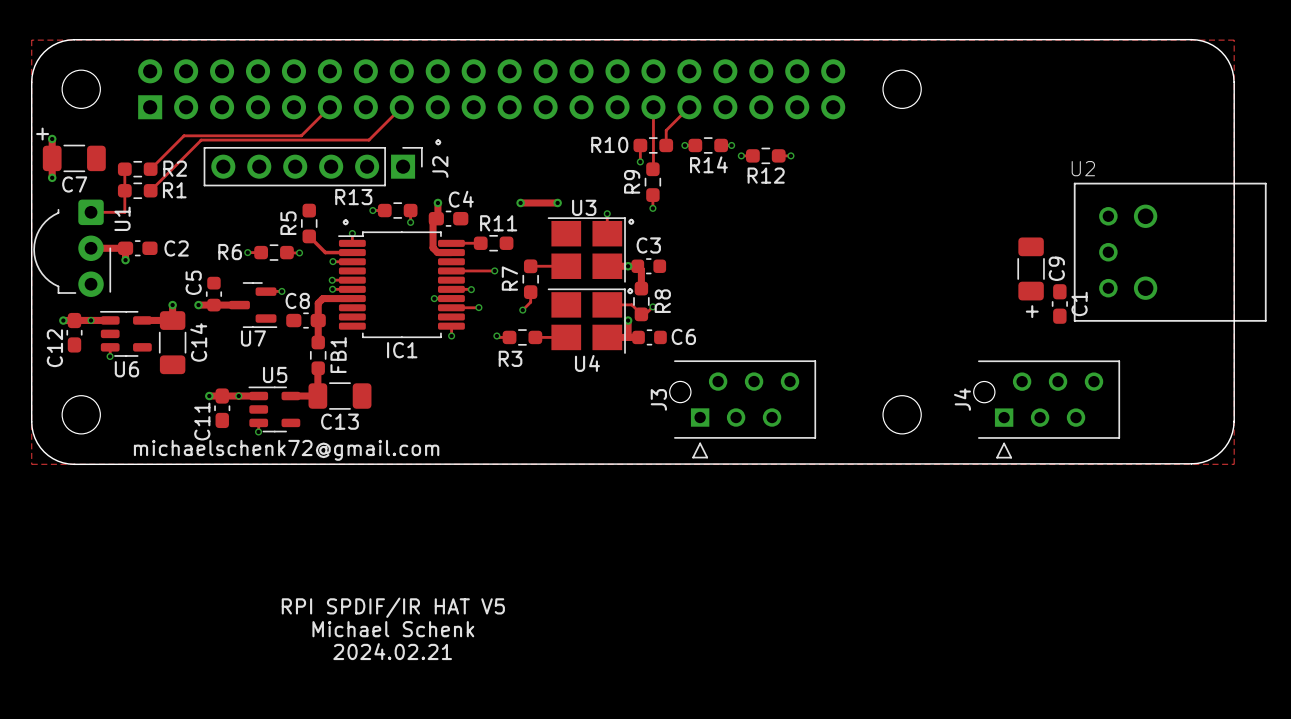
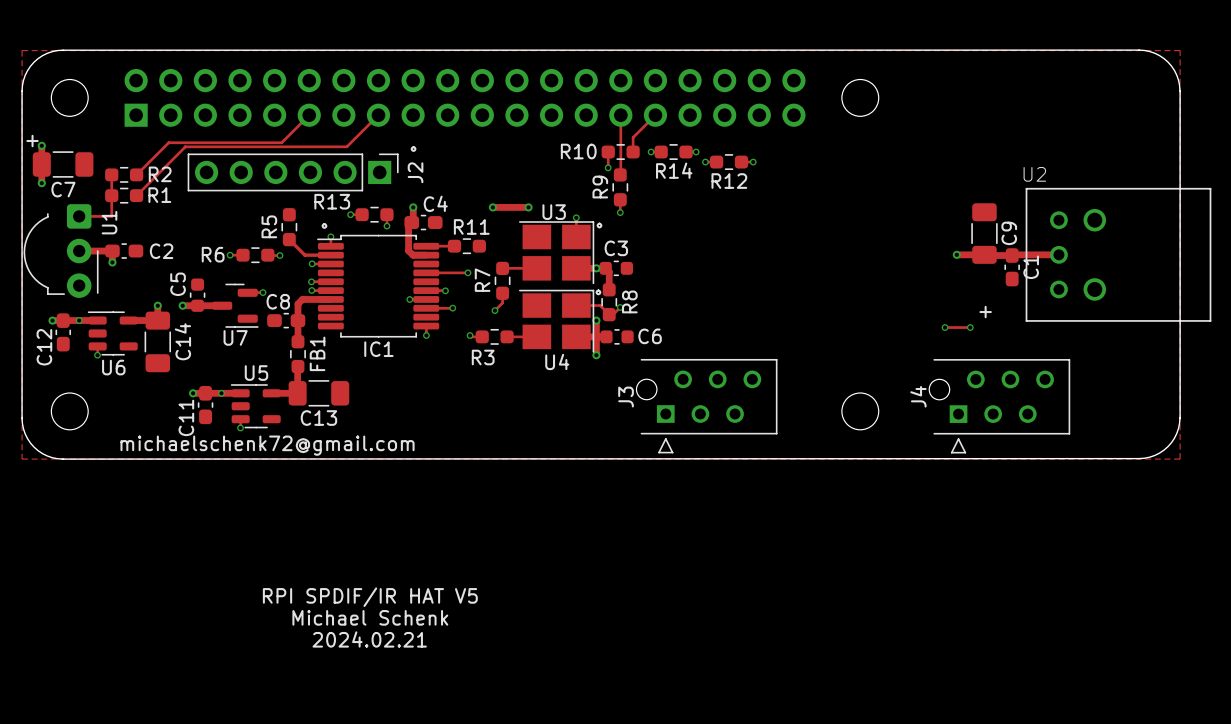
track: none -> (956, 254) (1058, 254)
via: none -> (956, 254)
C9 position: (1031, 268) -> (984, 233)
C1 position: (1059, 303) -> (1012, 267)
track: none -> (945, 327) (970, 327)
via: none -> (945, 327)
via: none -> (970, 327)
track: none -> (596, 336) (596, 355)
via: none -> (596, 355)

